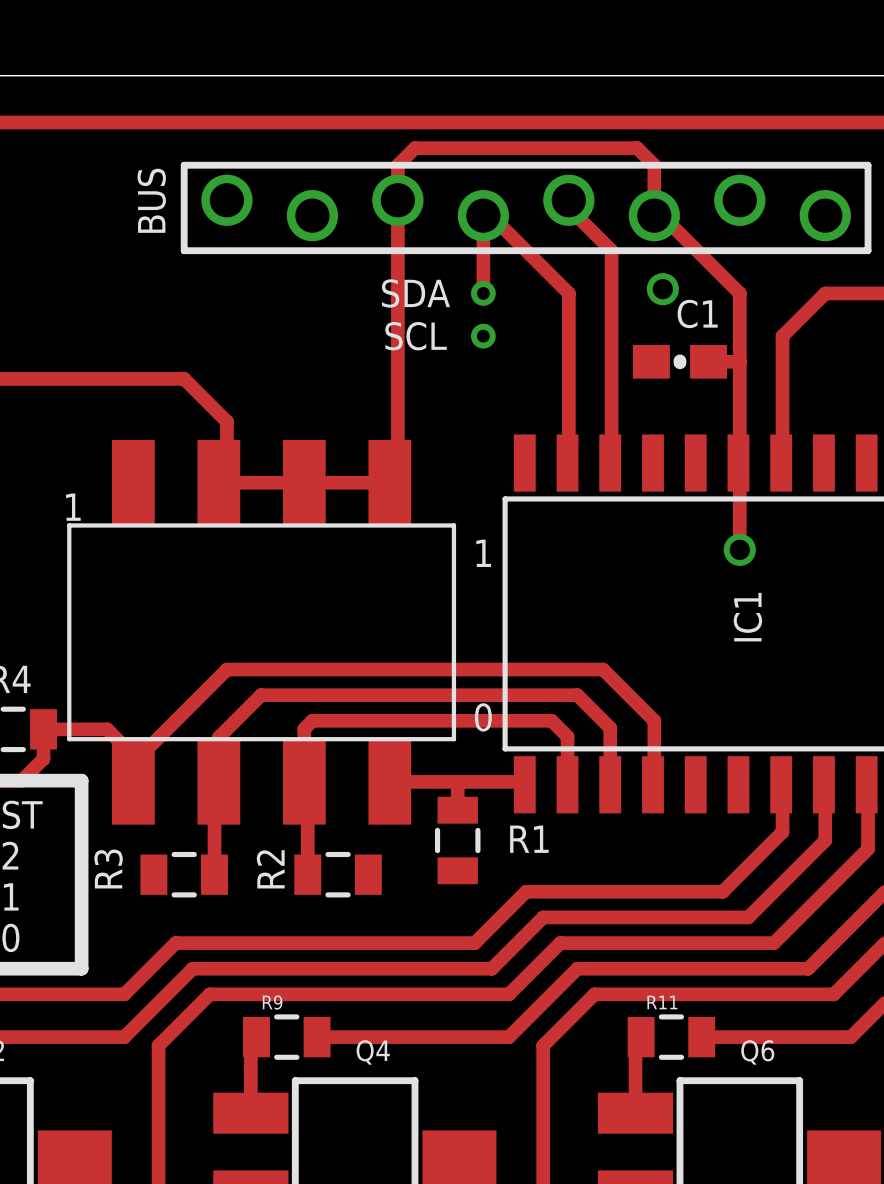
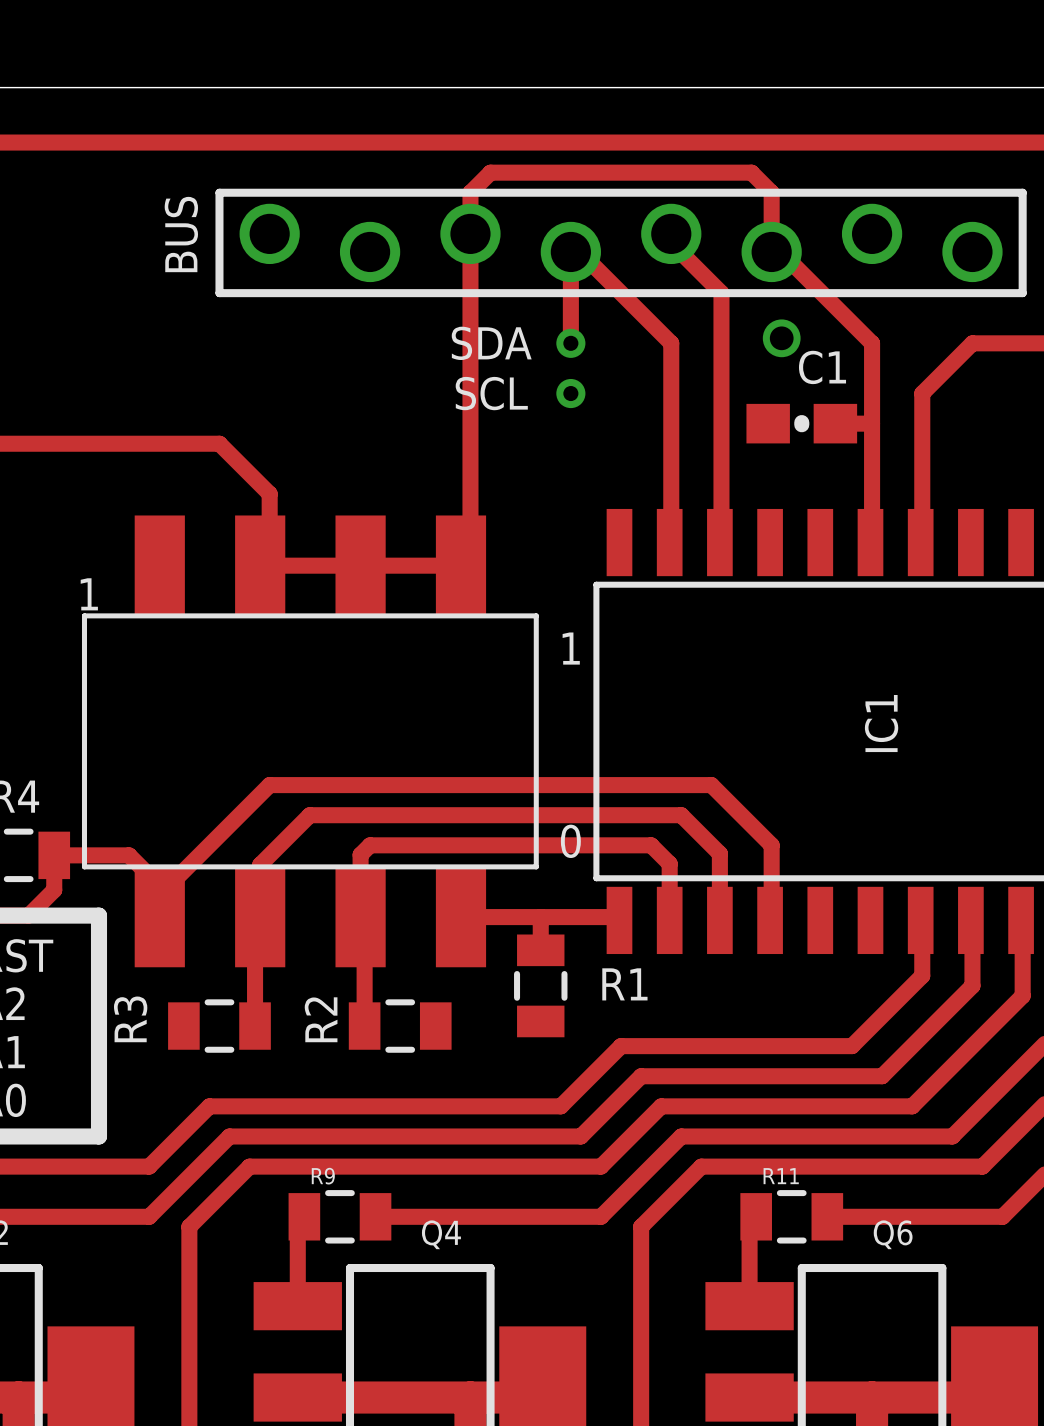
track: (738, 463) (739, 549) -> none
via: (739, 549) -> none

